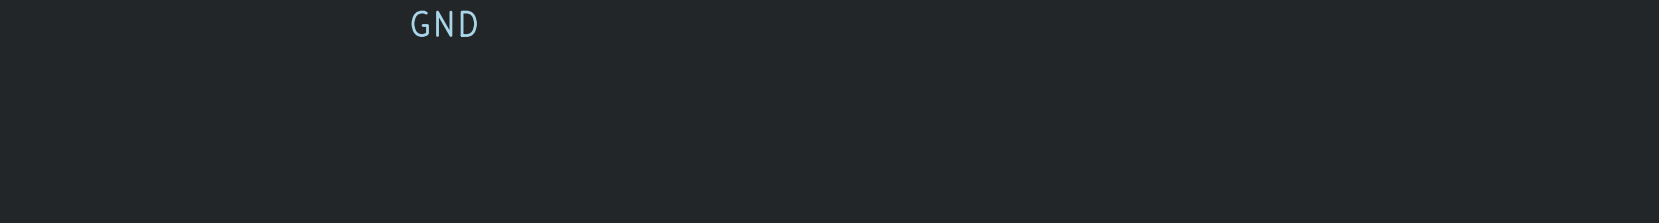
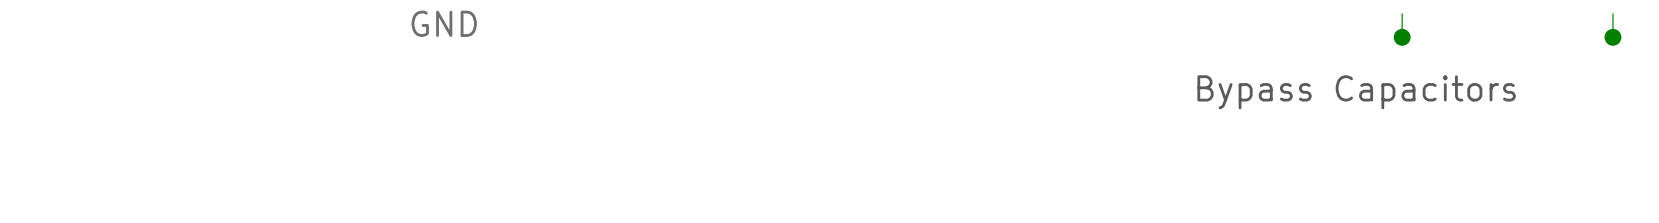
wire: none -> (1402, 13) (1402, 37)
wire: none -> (1612, 13) (1612, 37)
junction: none -> (1402, 37)
junction: none -> (1612, 37)
text: none -> Bypass Capacitors (1356, 92)

